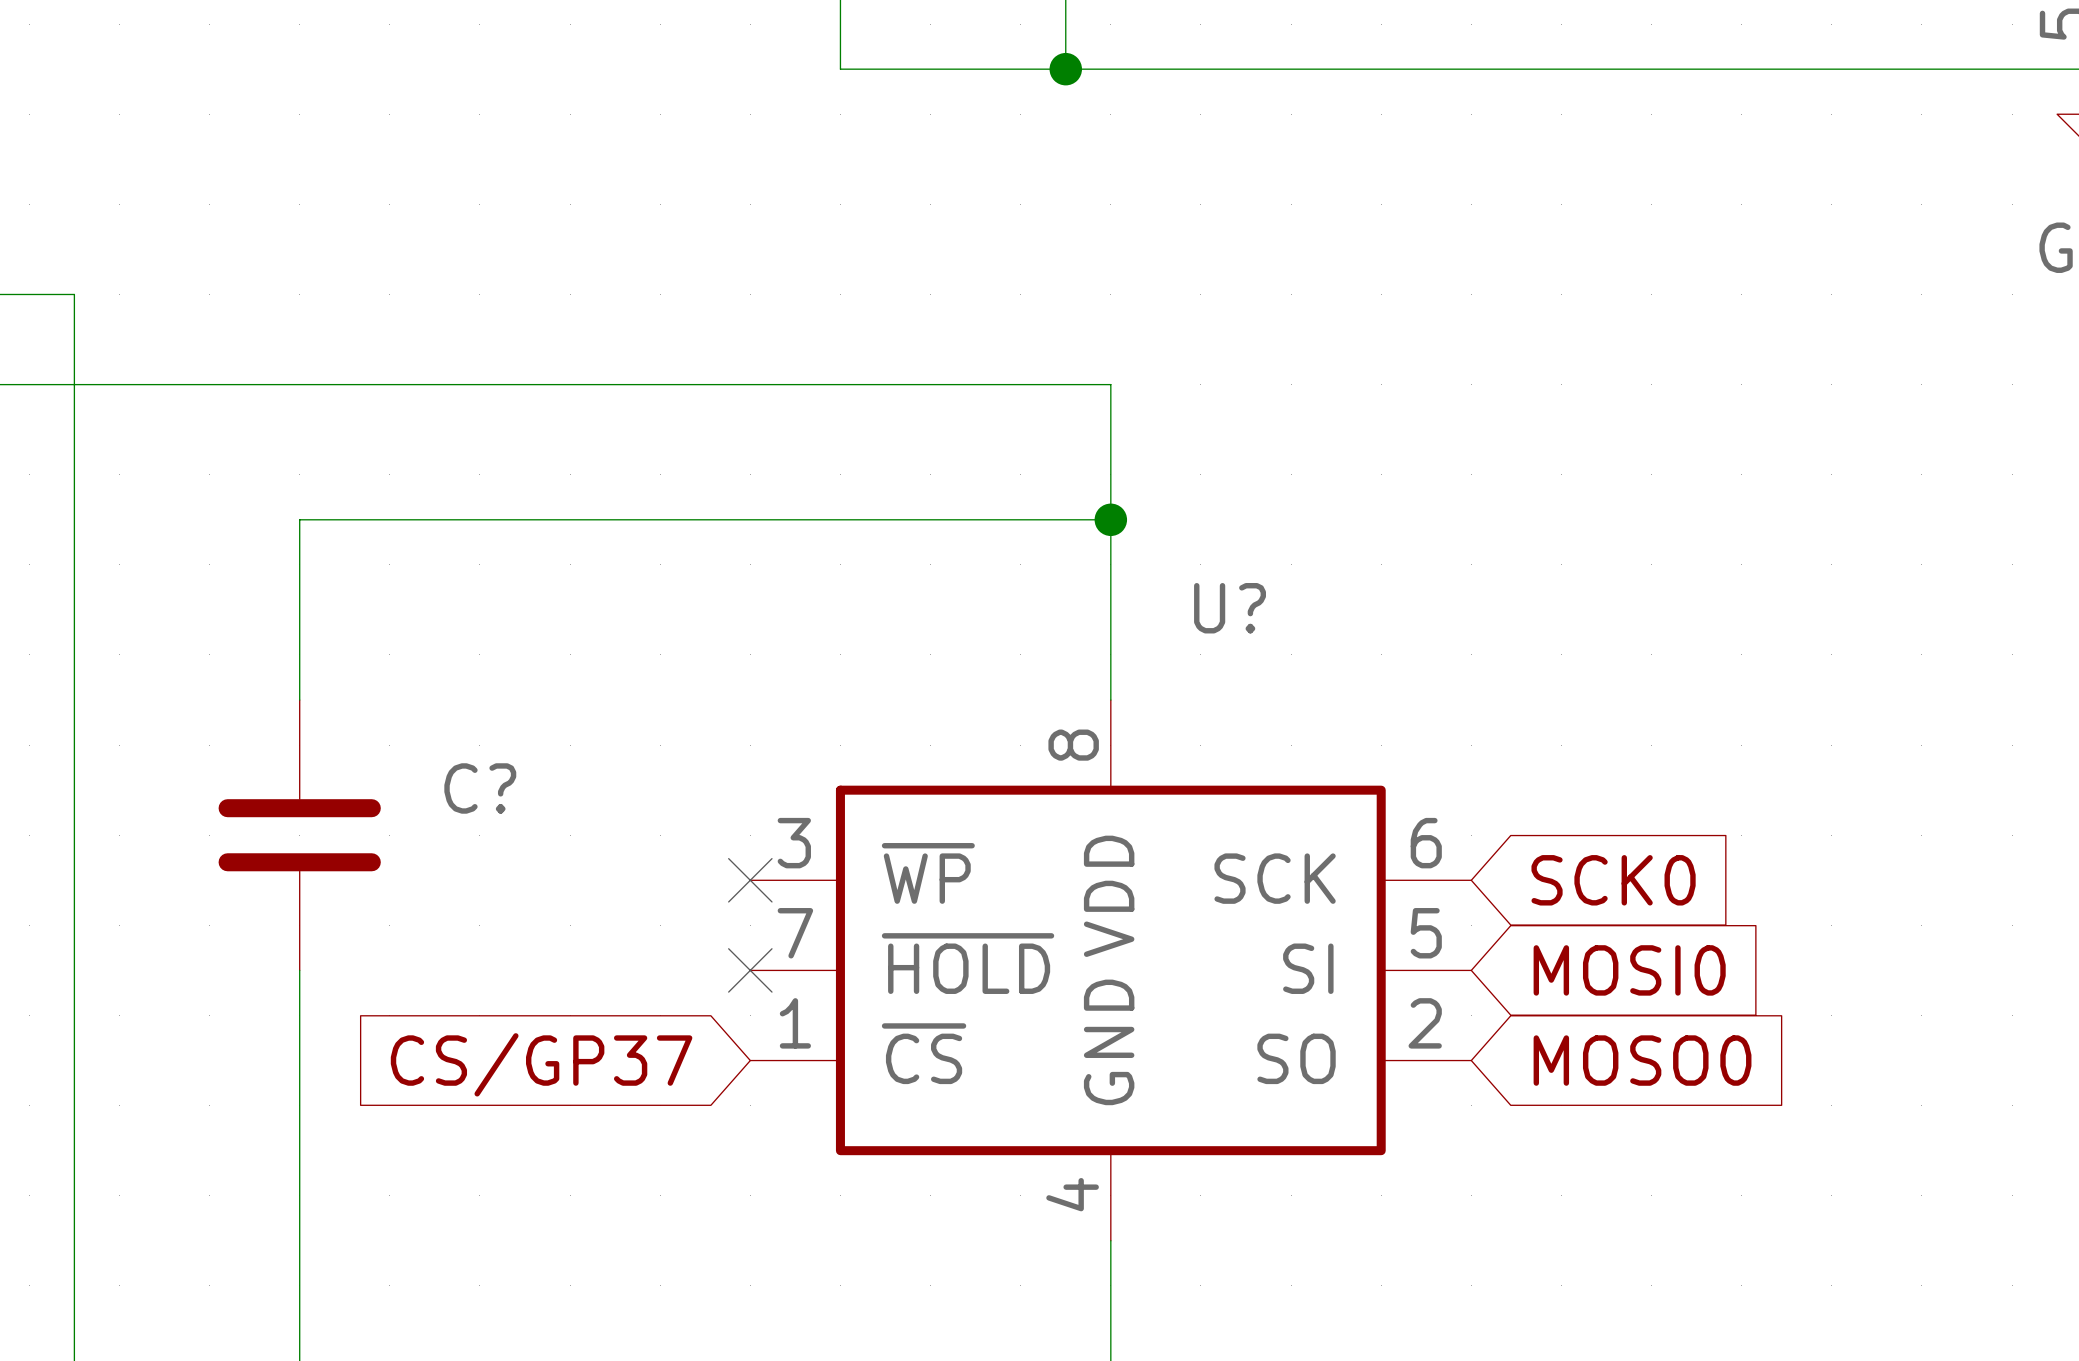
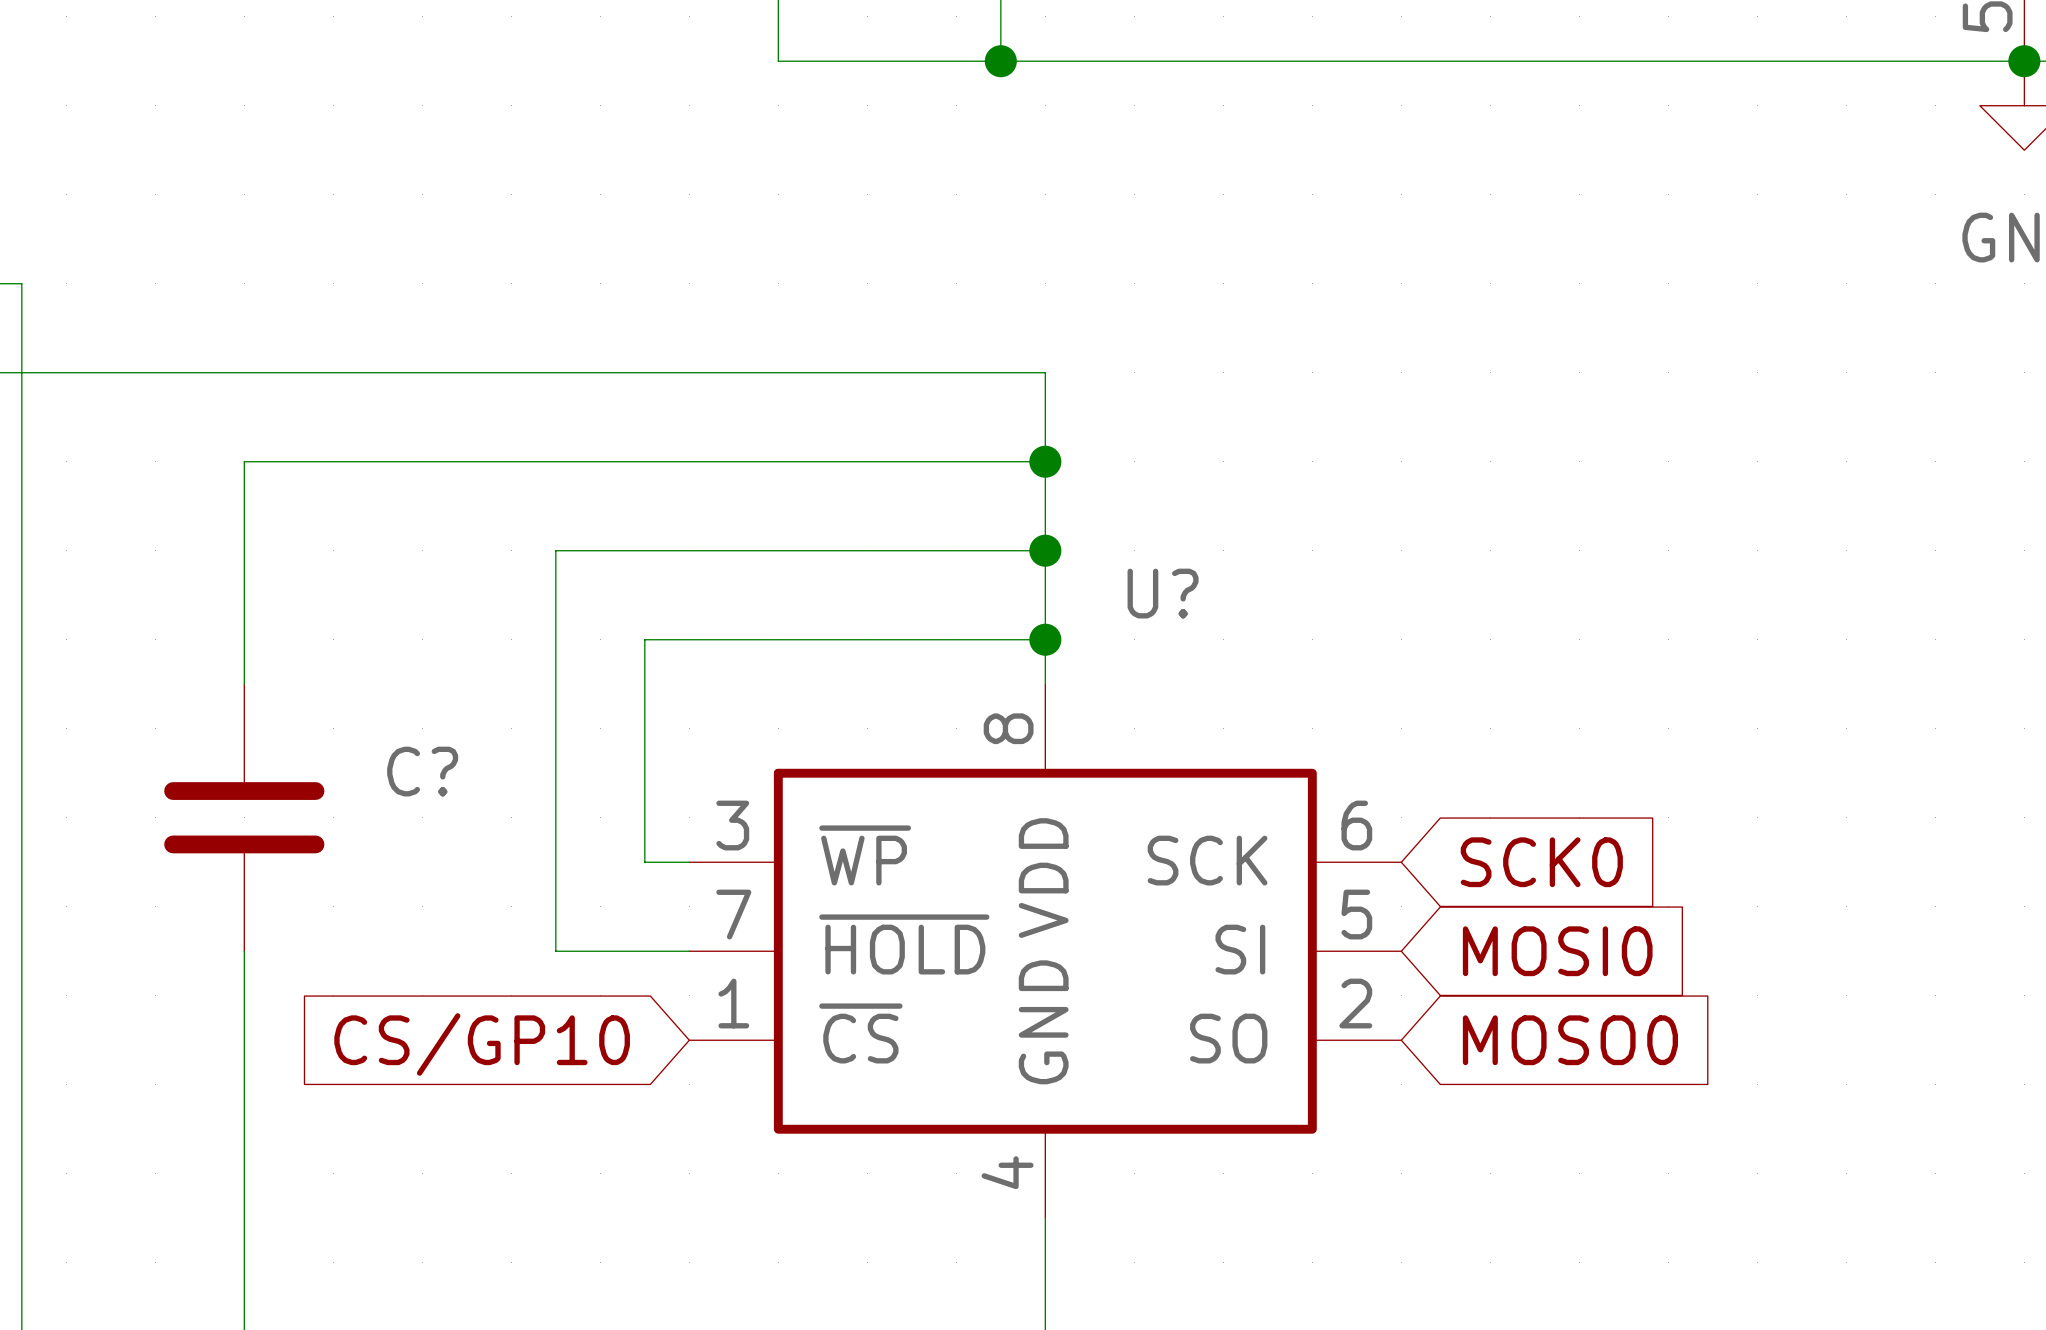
junction: none -> (1045, 461)
wire: (299, 519) (1110, 519) -> (244, 506) (244, 461) (1045, 461)
junction: (1110, 519) -> none
wire: none -> (1045, 550) (555, 550) (555, 951) (689, 951)
junction: none -> (1045, 550)
wire: none -> (1045, 639) (644, 639) (644, 862) (689, 862)
junction: none -> (1045, 639)
no-connect mark: (750, 880) -> none
no-connect mark: (750, 970) -> none
global label: CS/GP37 (541, 1064) -> CS/GP10 (482, 1044)

